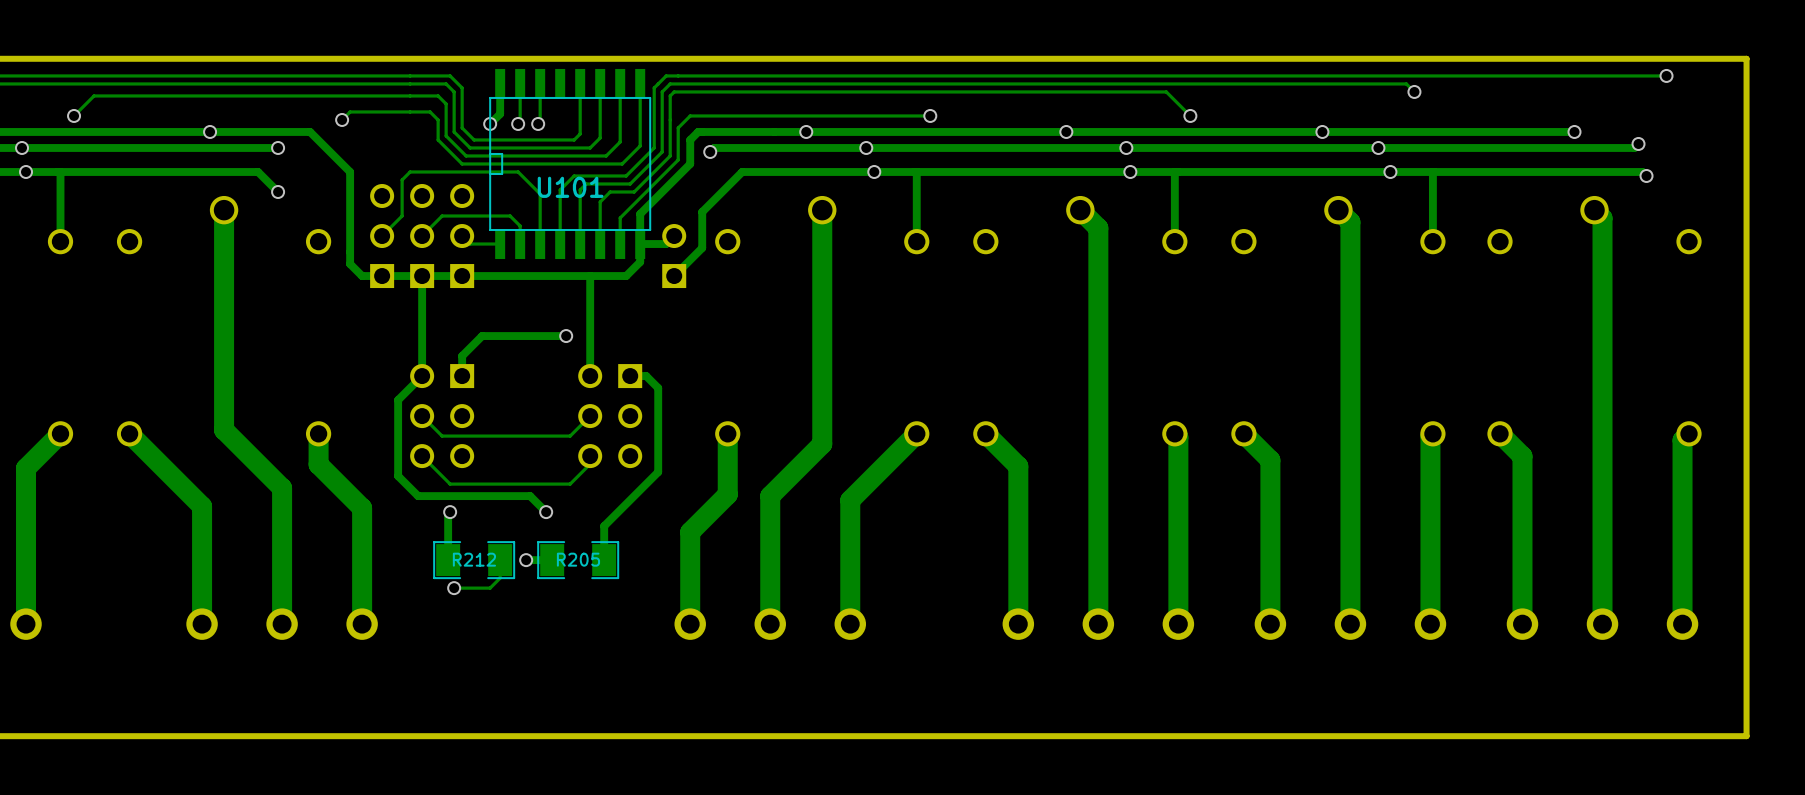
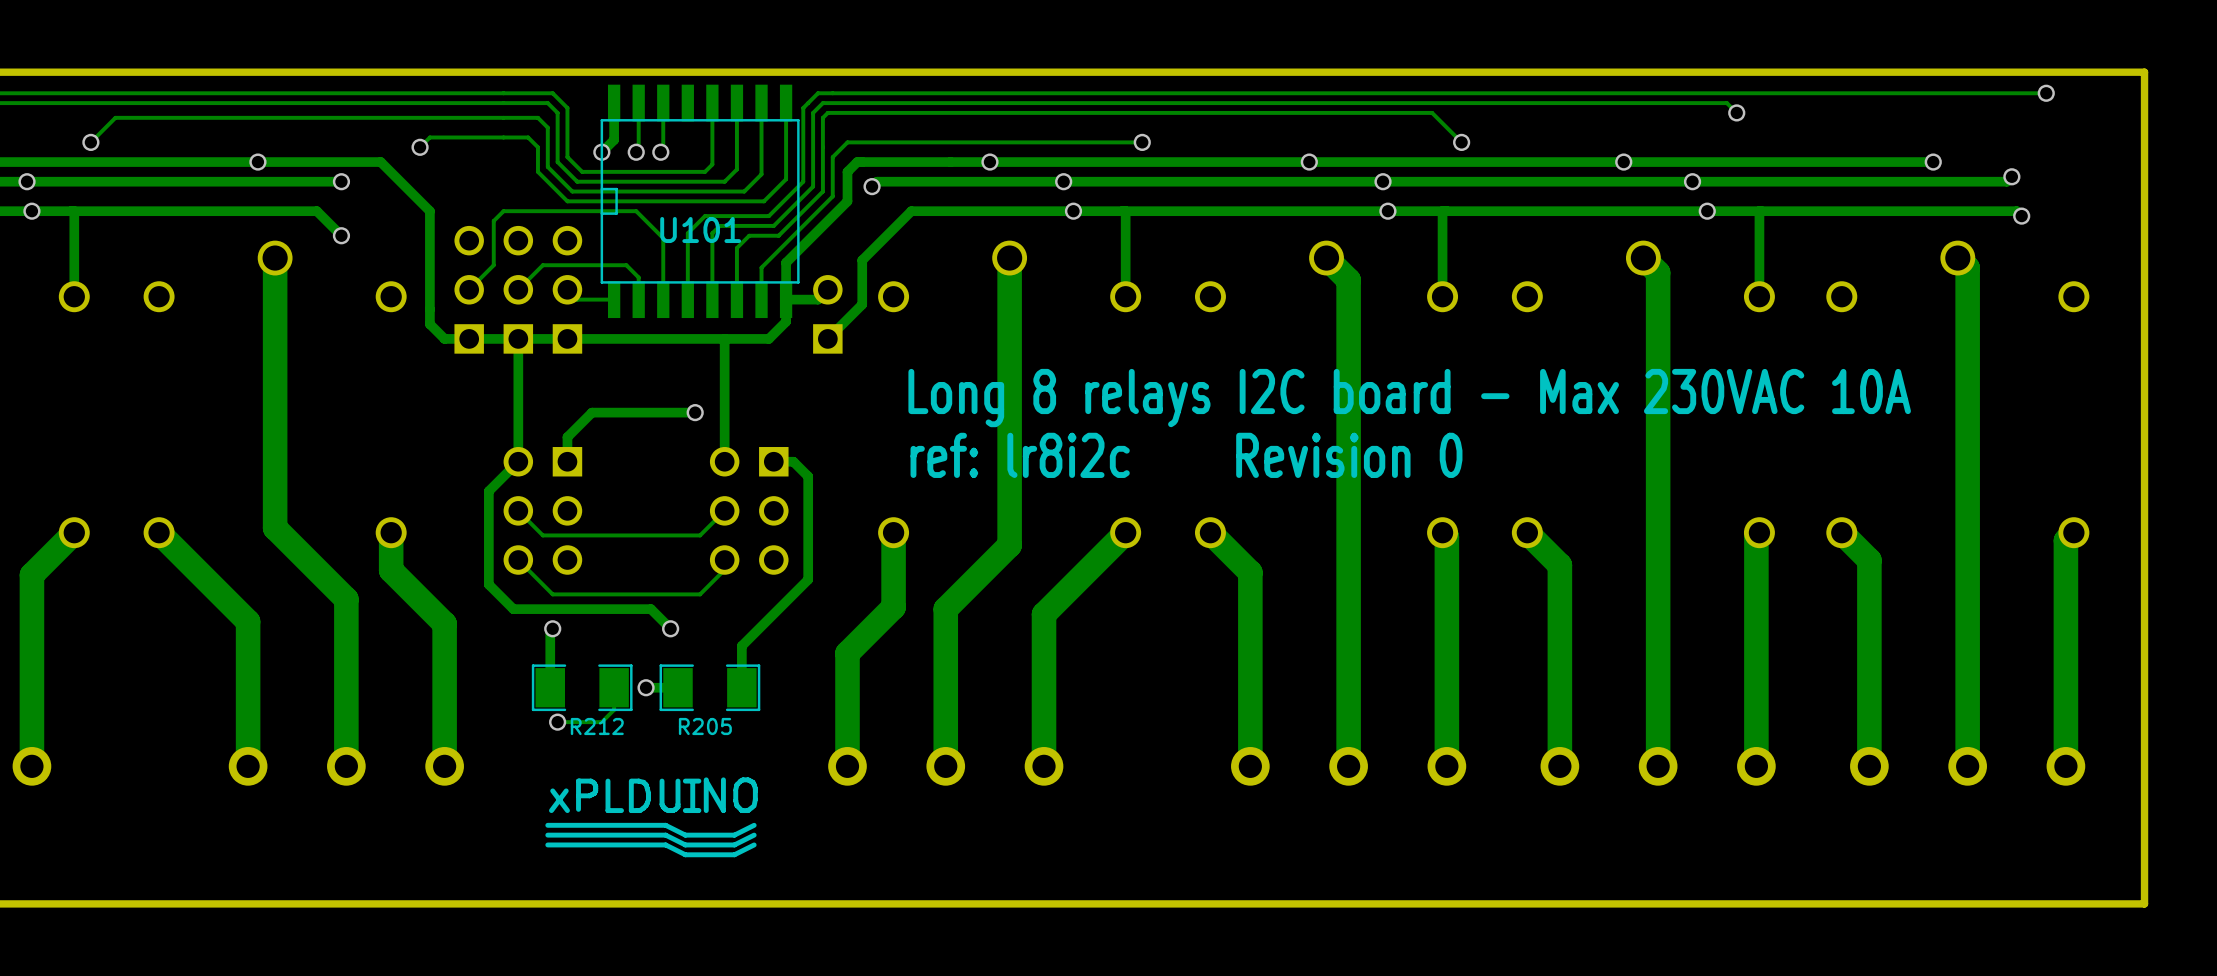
text: none -> Long 8 relays I2C board - Max 230VAC 10A (1409, 398)
text: none -> ref: lr8i2c (1020, 455)
text: none -> Revision 0 (1349, 455)
R212 name position: R212 (474, 559) -> R212 (597, 726)
R205 name position: R205 (578, 559) -> R205 (705, 726)
drawing: none -> [545, 777, 758, 858]

